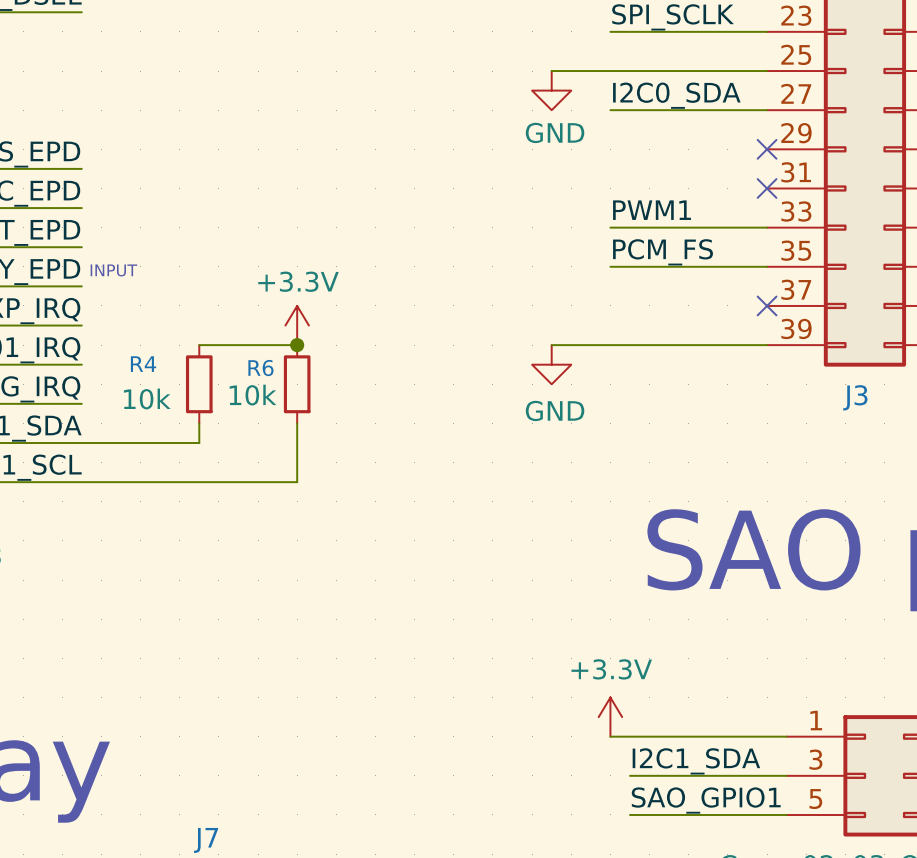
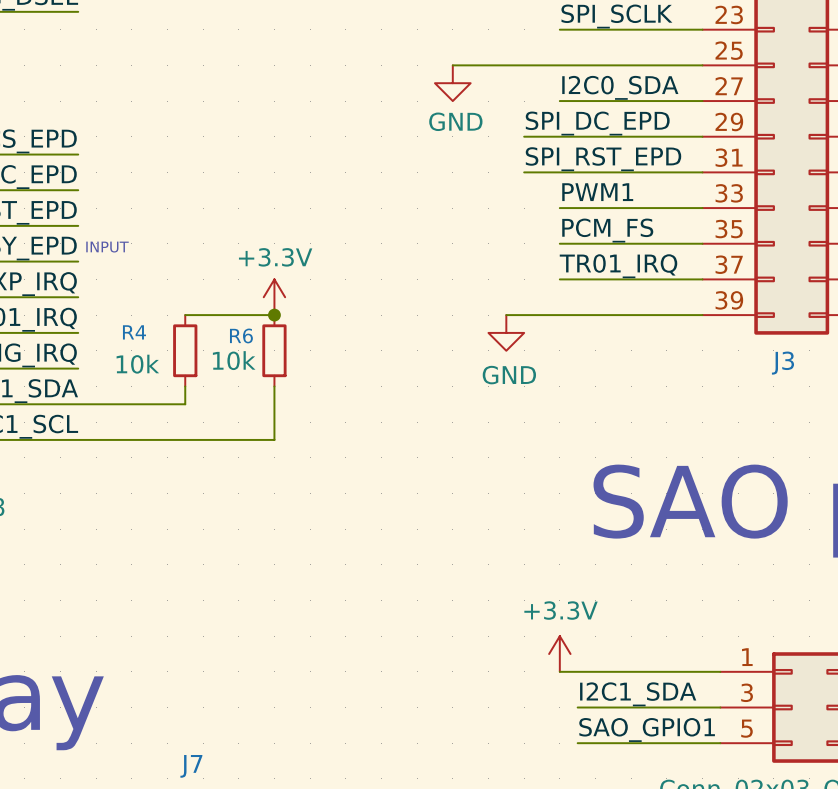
wire: none -> (452, 65) (506, 65)
power symbol position: GND (551, 90) -> GND (452, 83)
label: none -> SPI_DC_EPD (597, 123)
wire: none -> (524, 136) (702, 136)
no-connect mark: (767, 149) -> none
label: none -> SPI_RST_EPD (603, 159)
wire: none -> (524, 172) (702, 172)
no-connect mark: (767, 188) -> none
label: none -> TR01_IRQ (618, 266)
wire: none -> (559, 279) (702, 279)
no-connect mark: (767, 305) -> none

